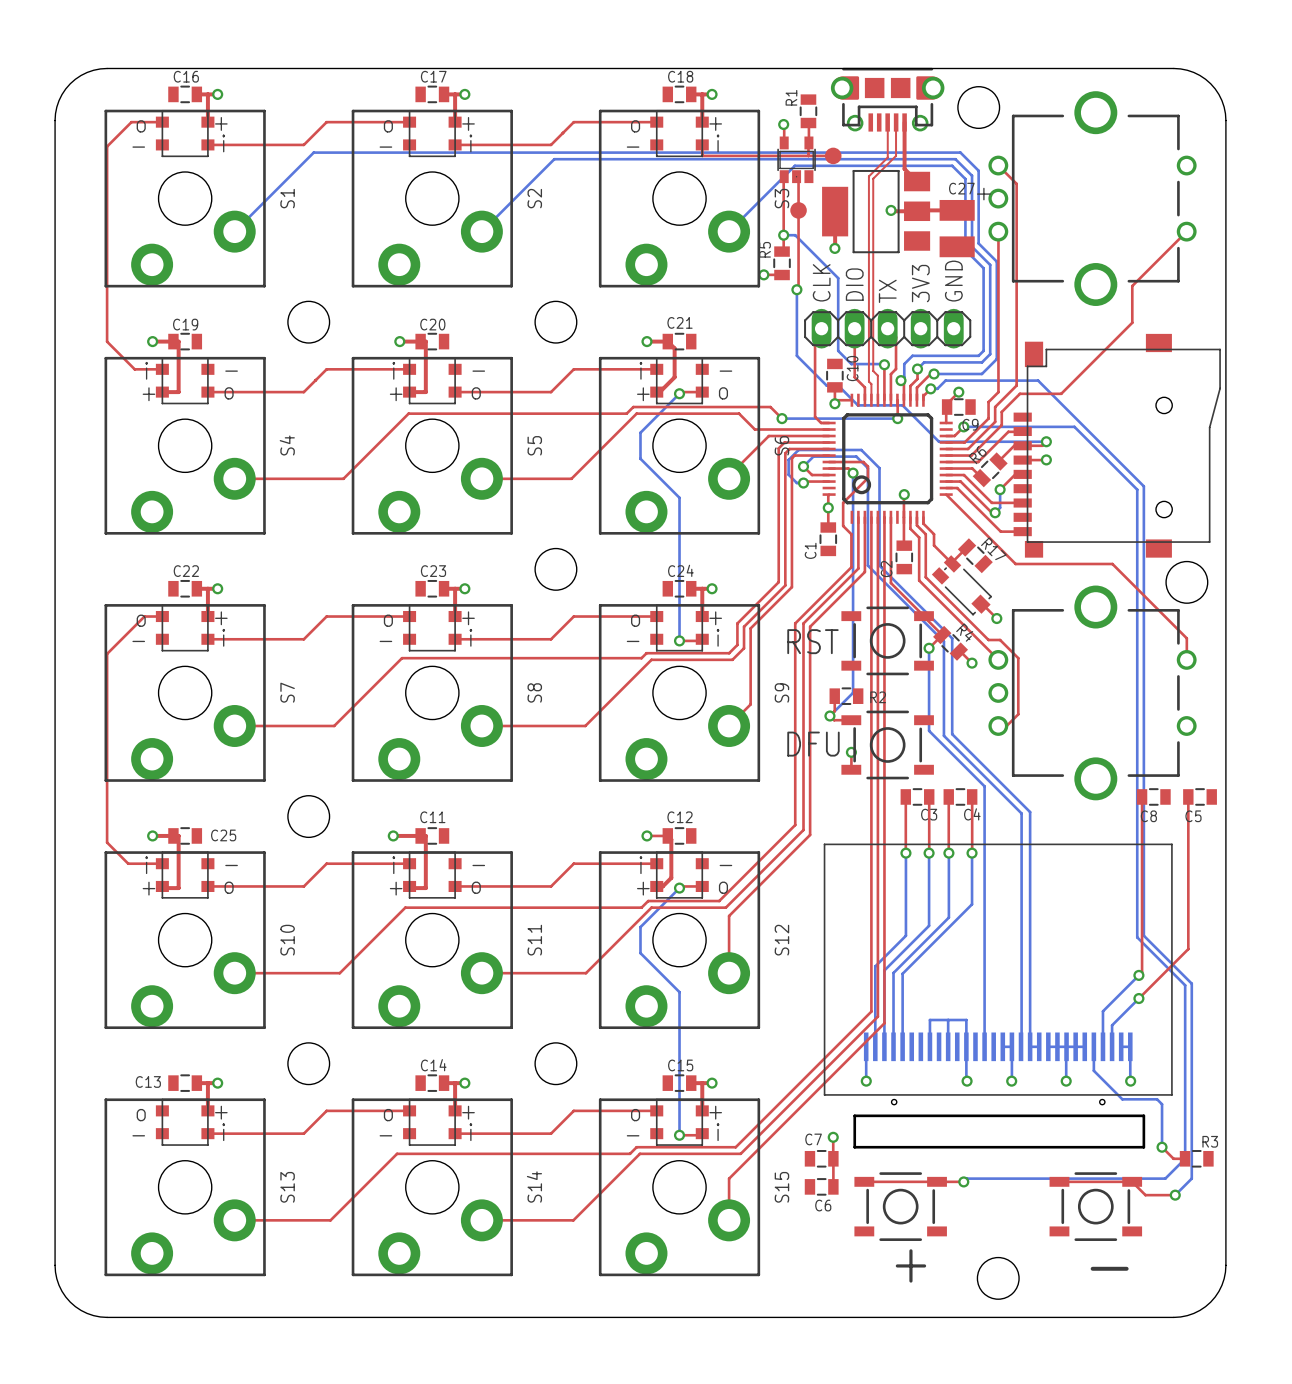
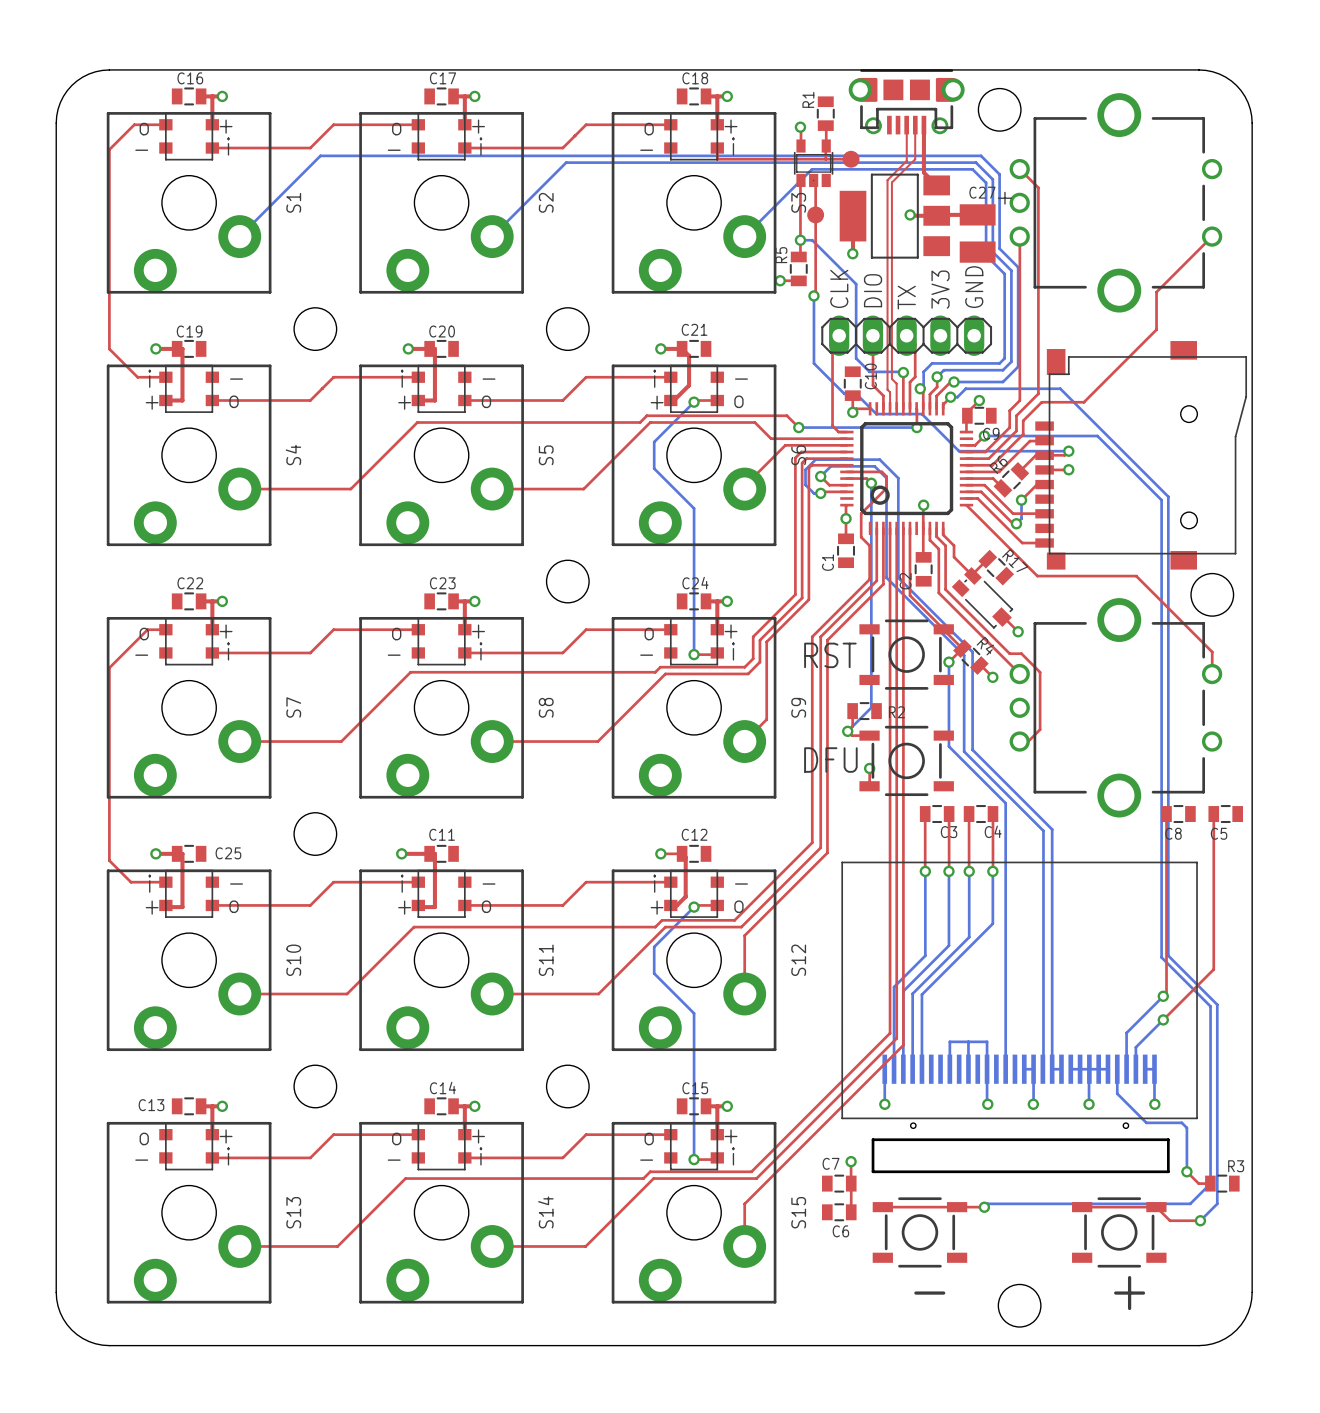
text: + (910, 1265) -> - (929, 1293)
text: - (1109, 1268) -> + (1129, 1293)

